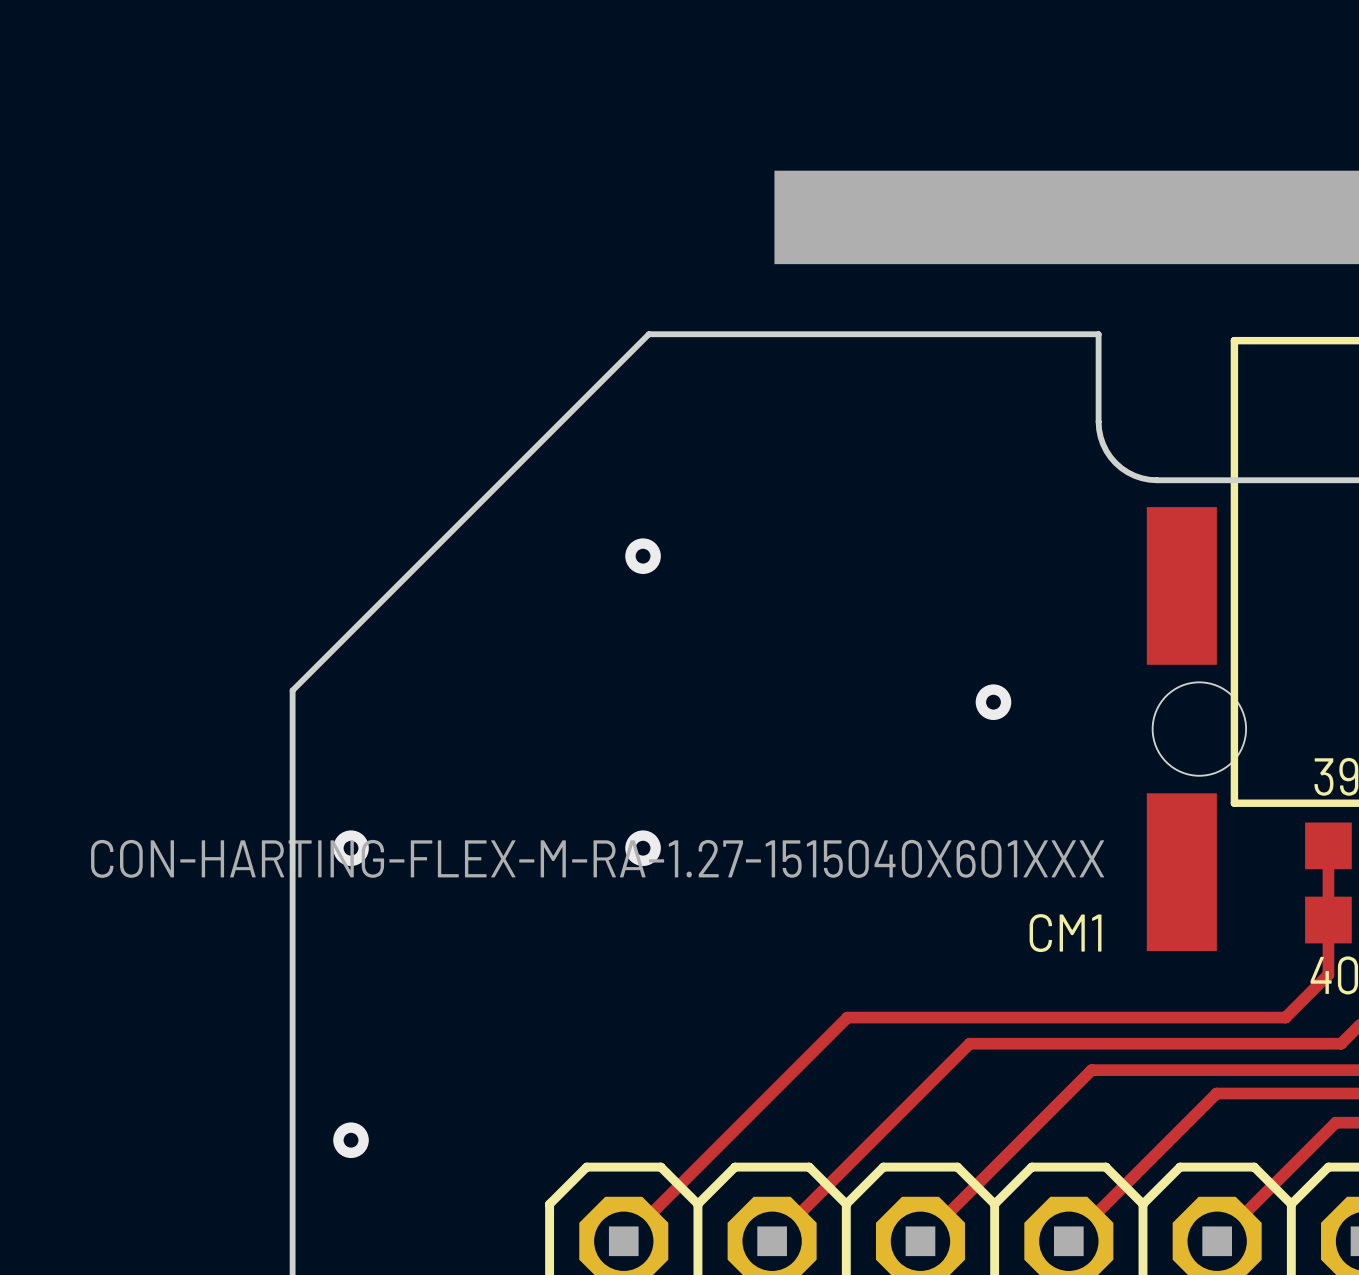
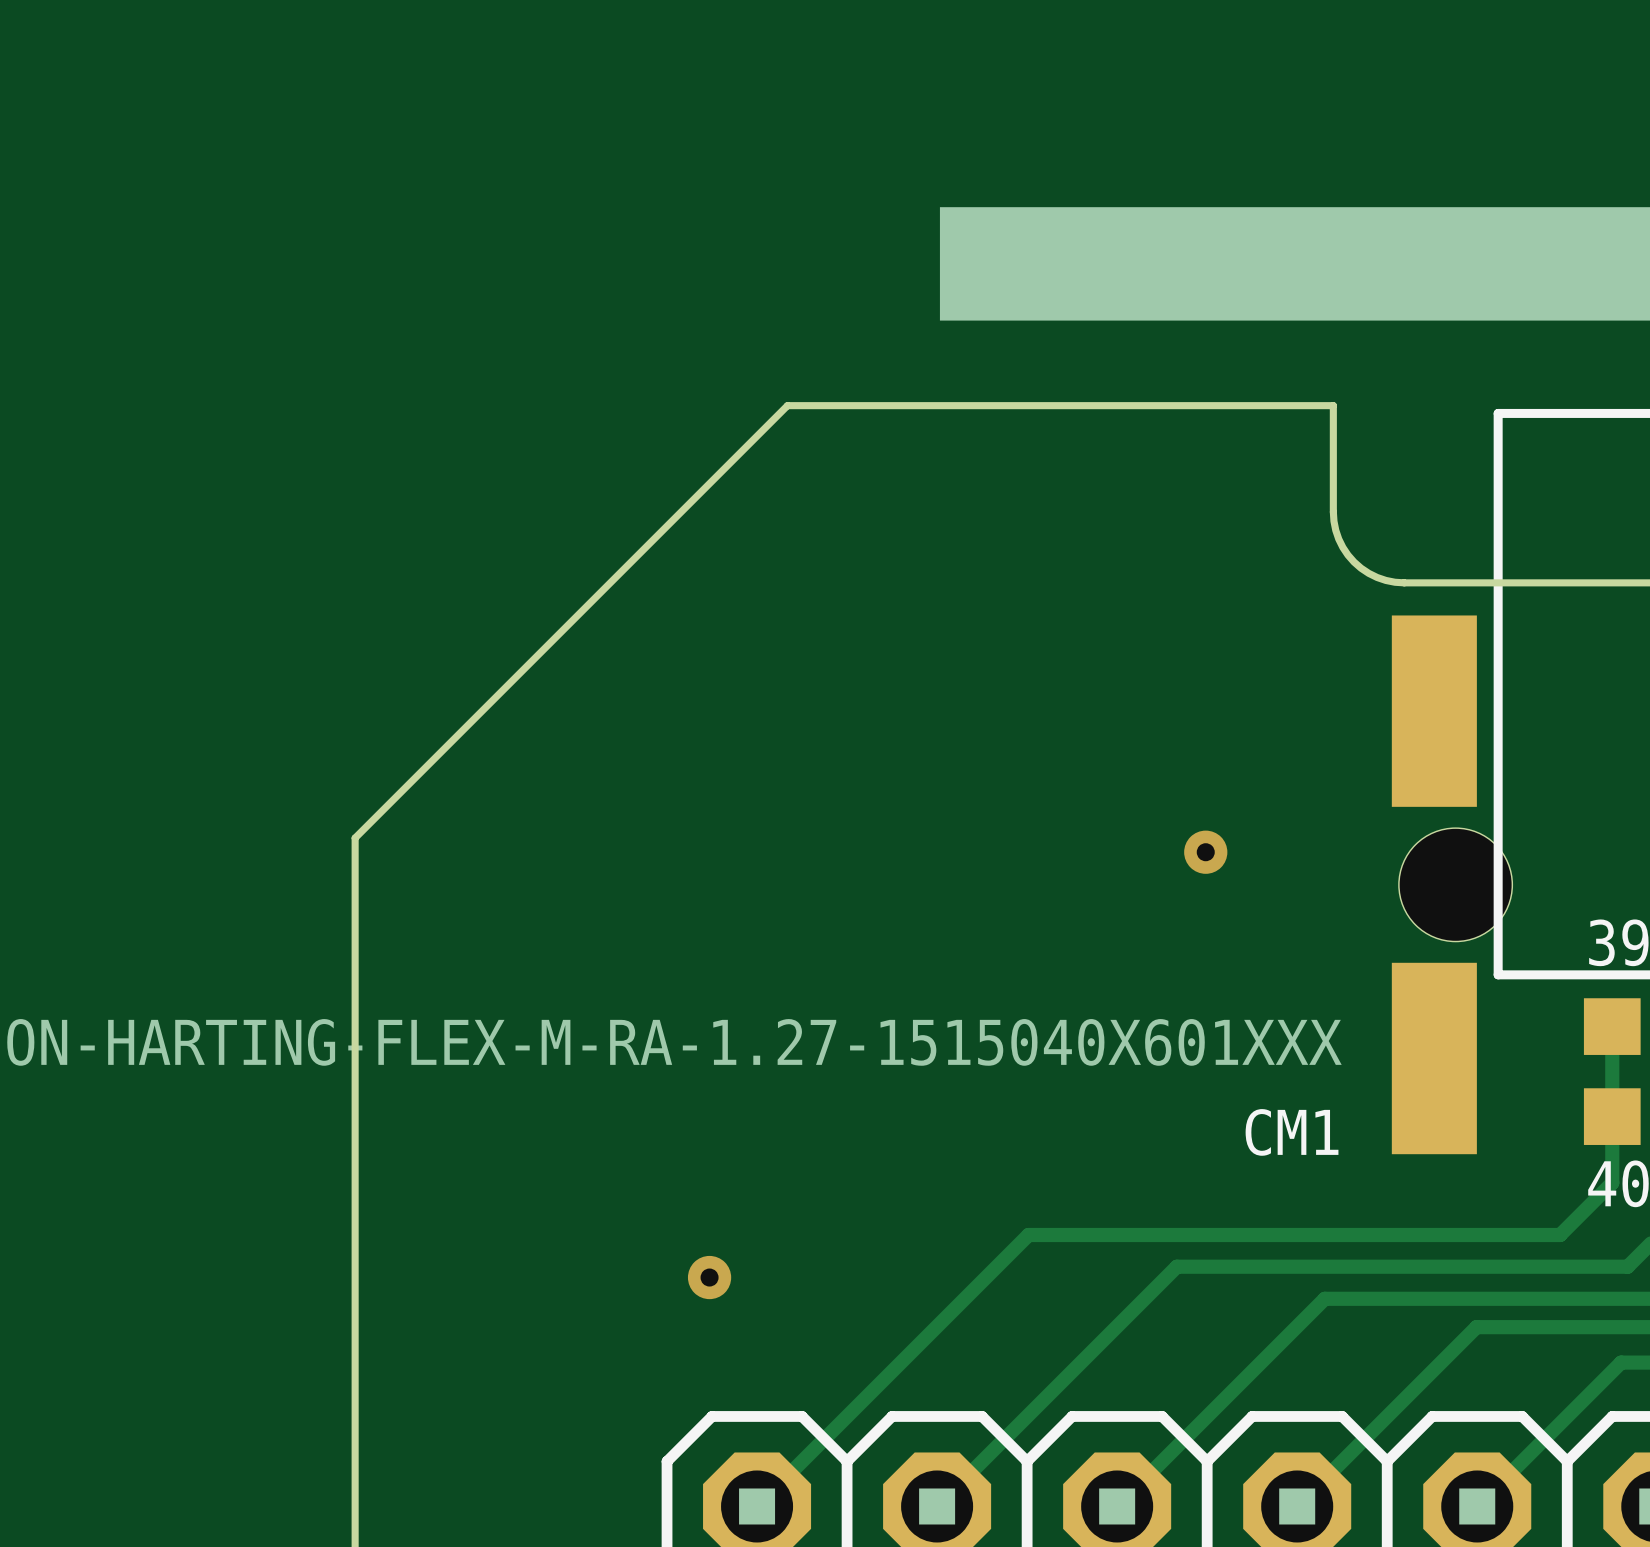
via: (643, 556) -> none
via: (351, 848) -> none
via: (643, 848) -> none
via: none -> (709, 1277)
via: (351, 1140) -> none

